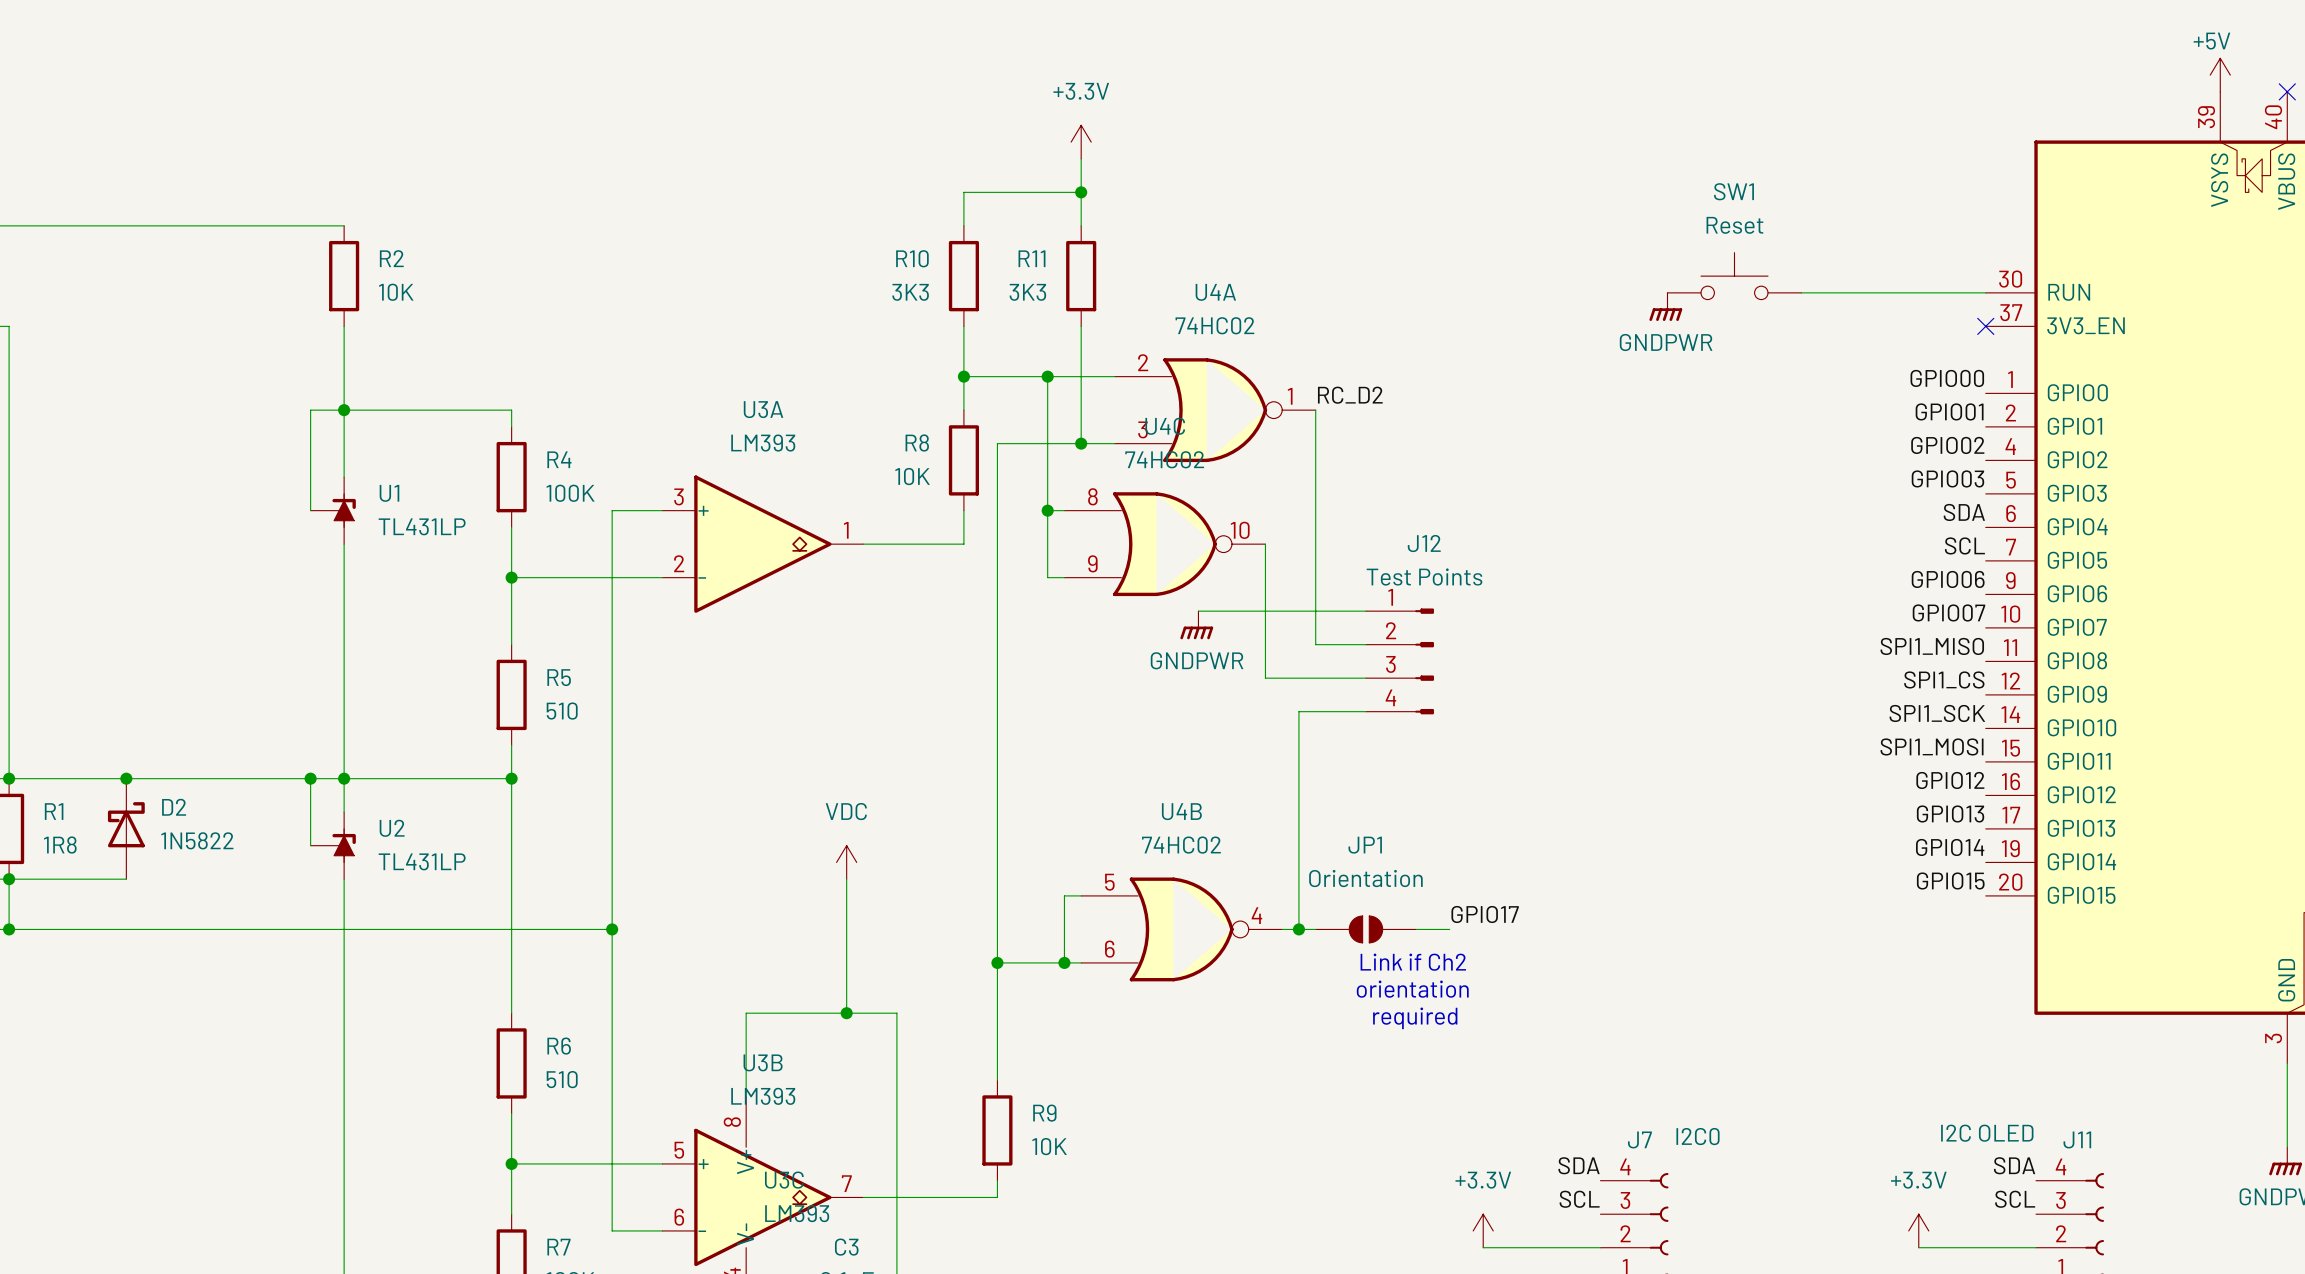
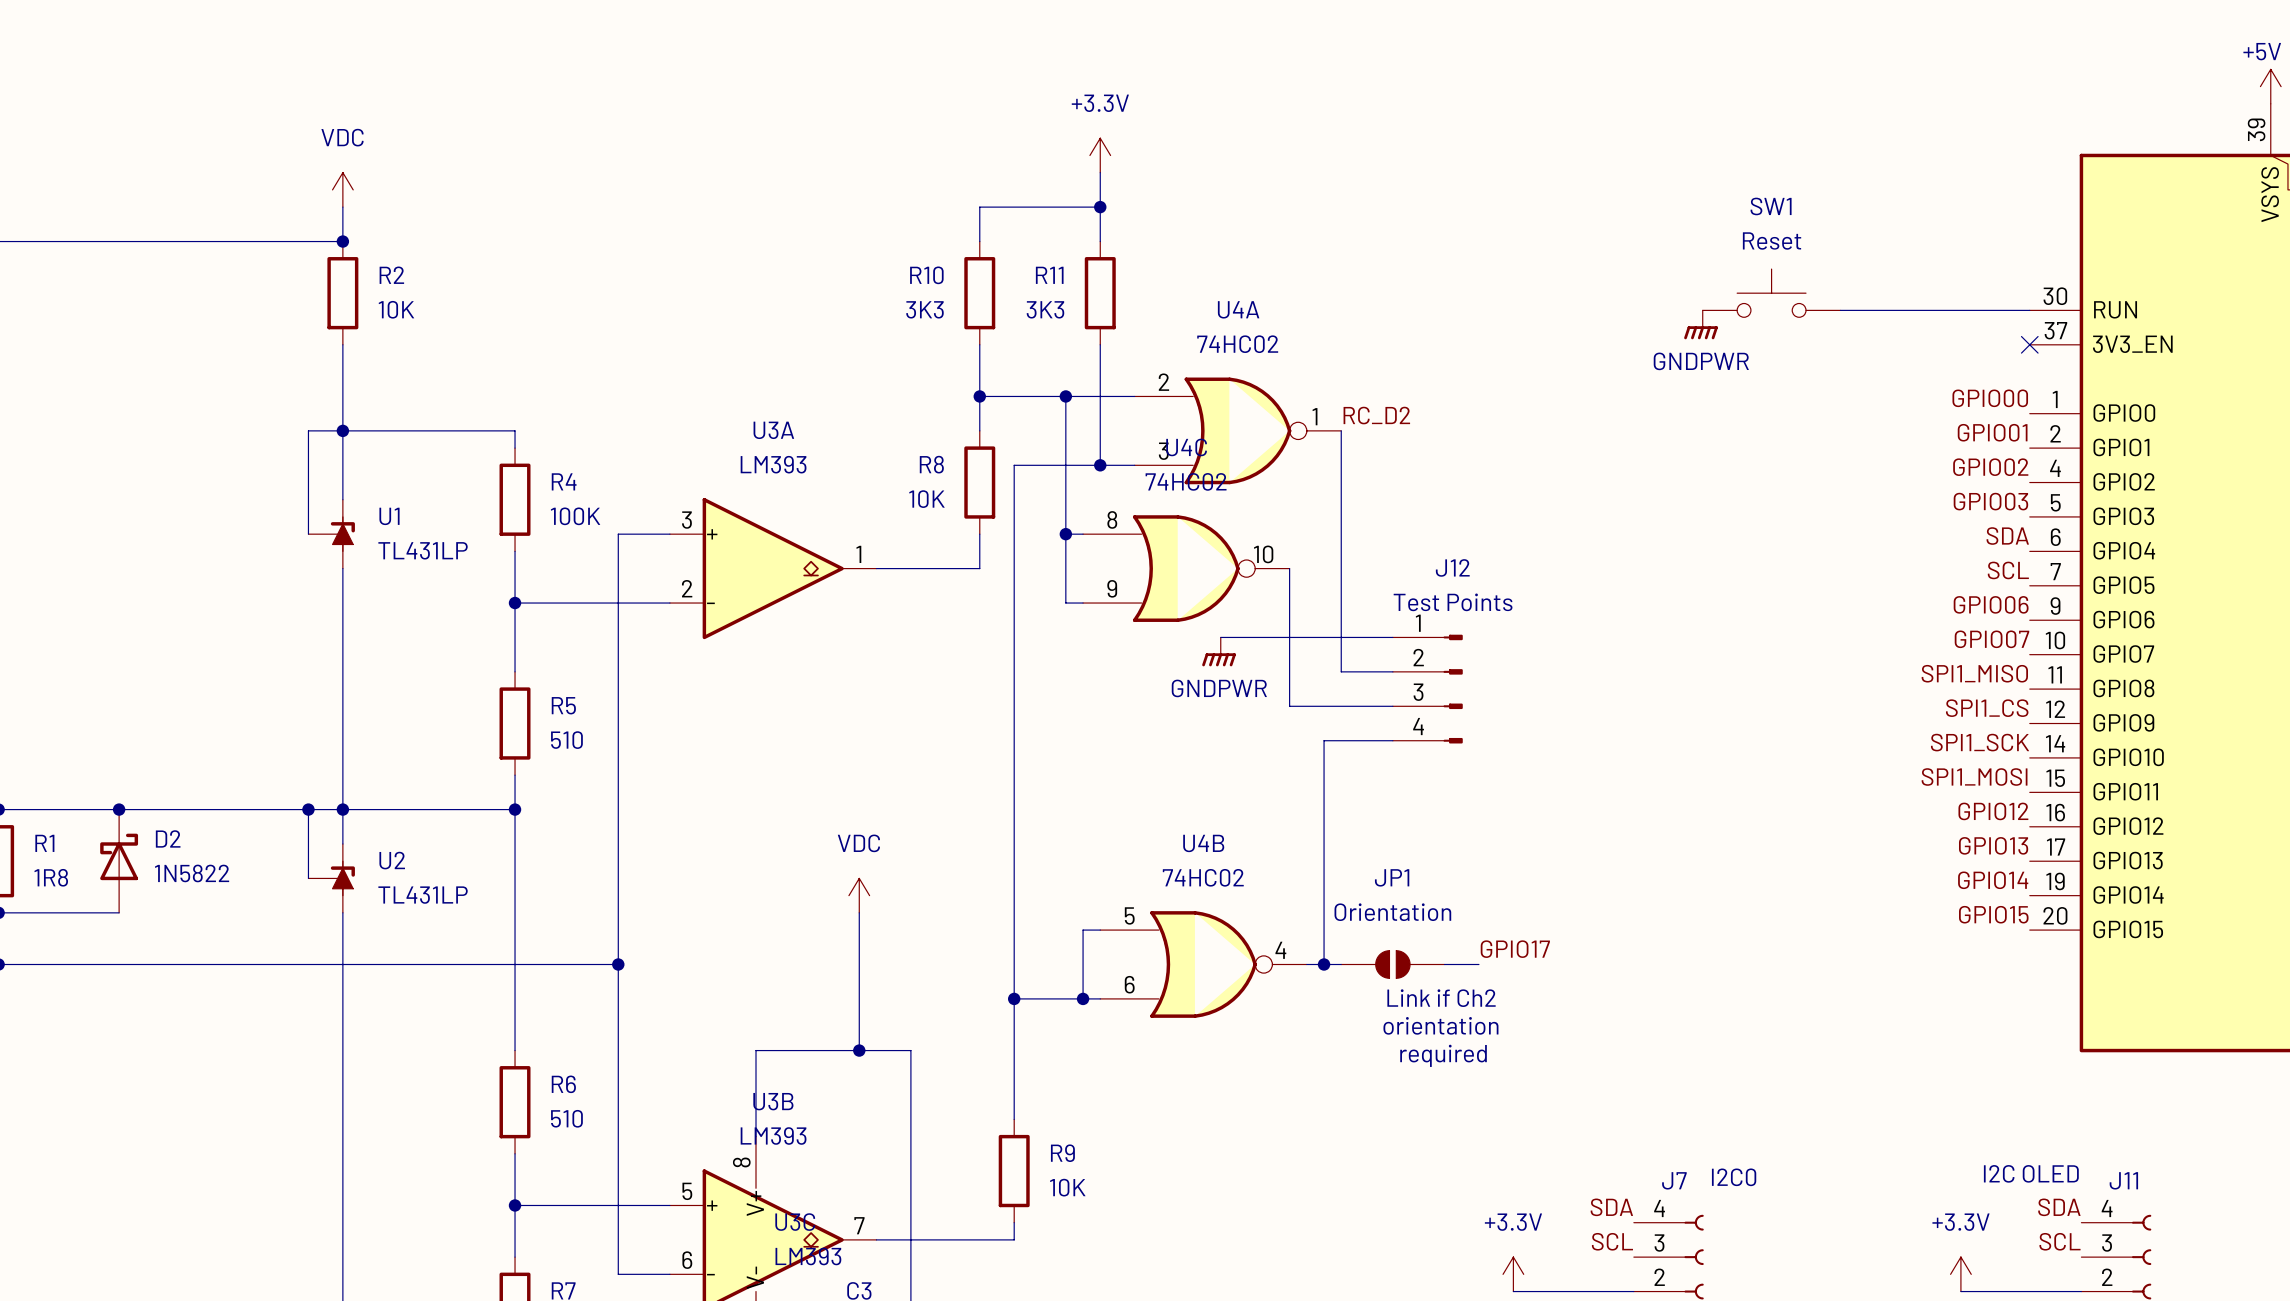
power symbol: none -> VDC (342, 189)
wire: none -> (342, 207) (342, 241)
junction: none -> (342, 241)

